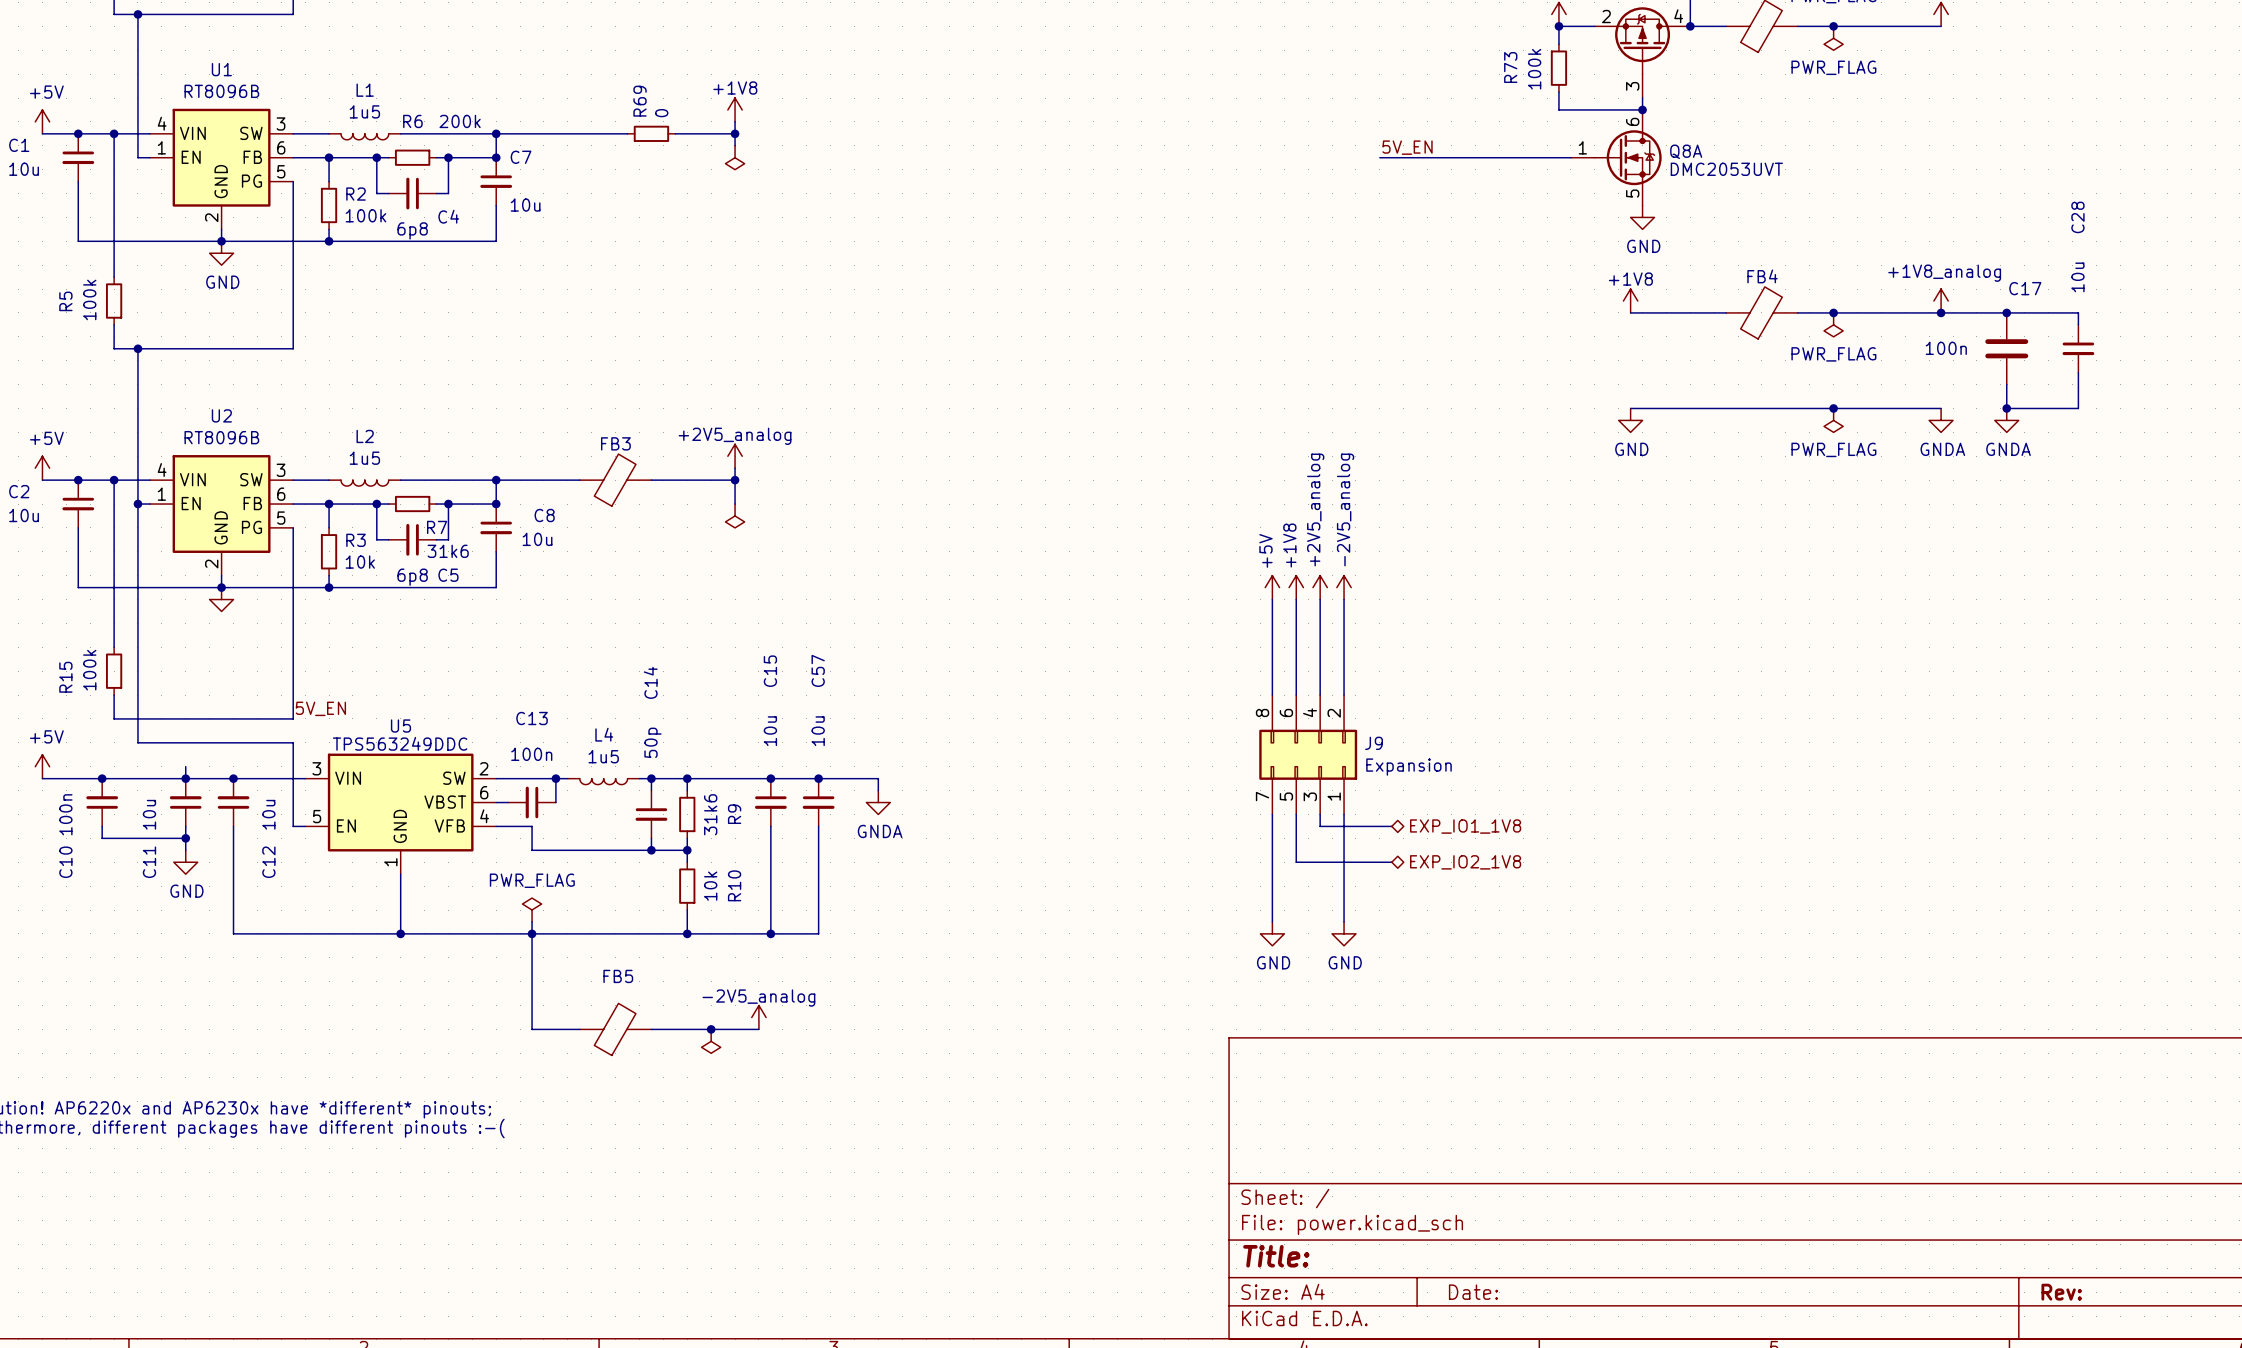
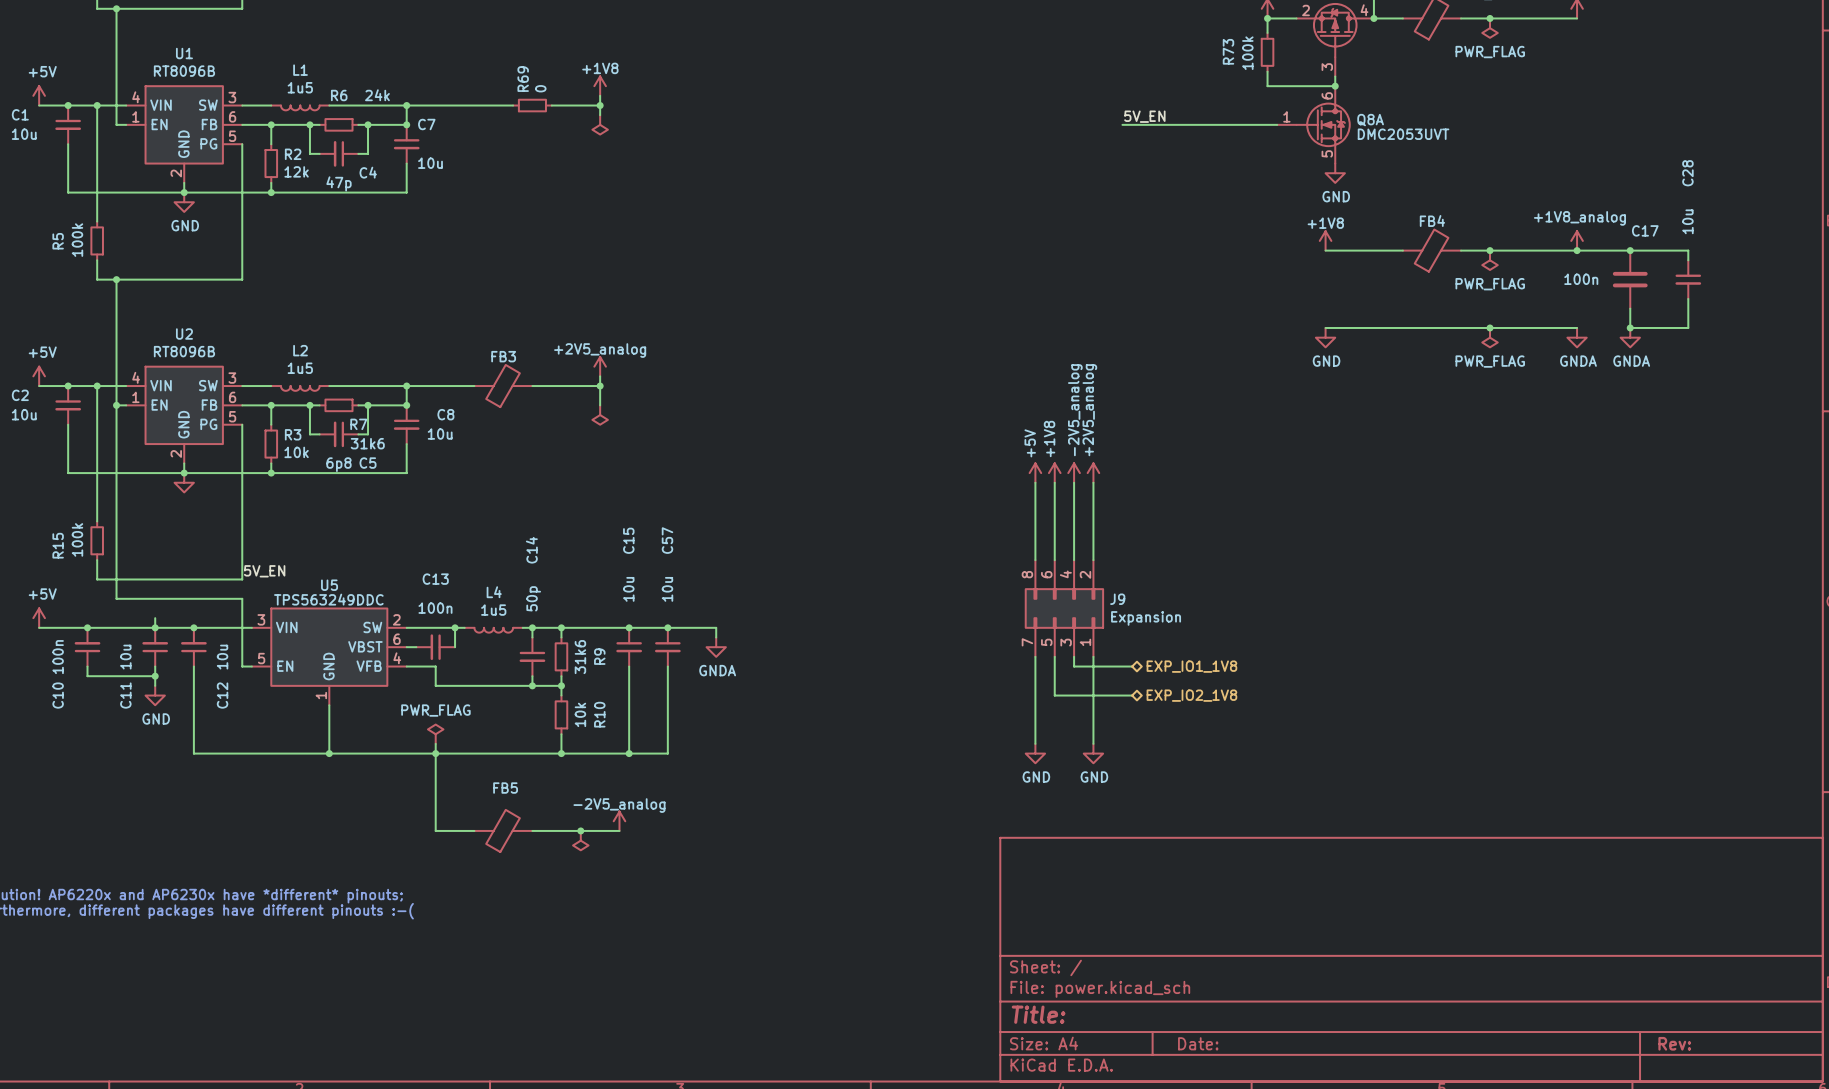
R6 value: 200k (460, 121) -> 24k (377, 95)
R2 value: 100k (365, 215) -> 12k (296, 171)
C4 value: 6p8 (412, 230) -> 47p (338, 183)
power symbol: +2V5_analog (1320, 587) -> -2V5_analog (1074, 473)
power symbol: -2V5_analog (1344, 587) -> +2V5_analog (1093, 473)

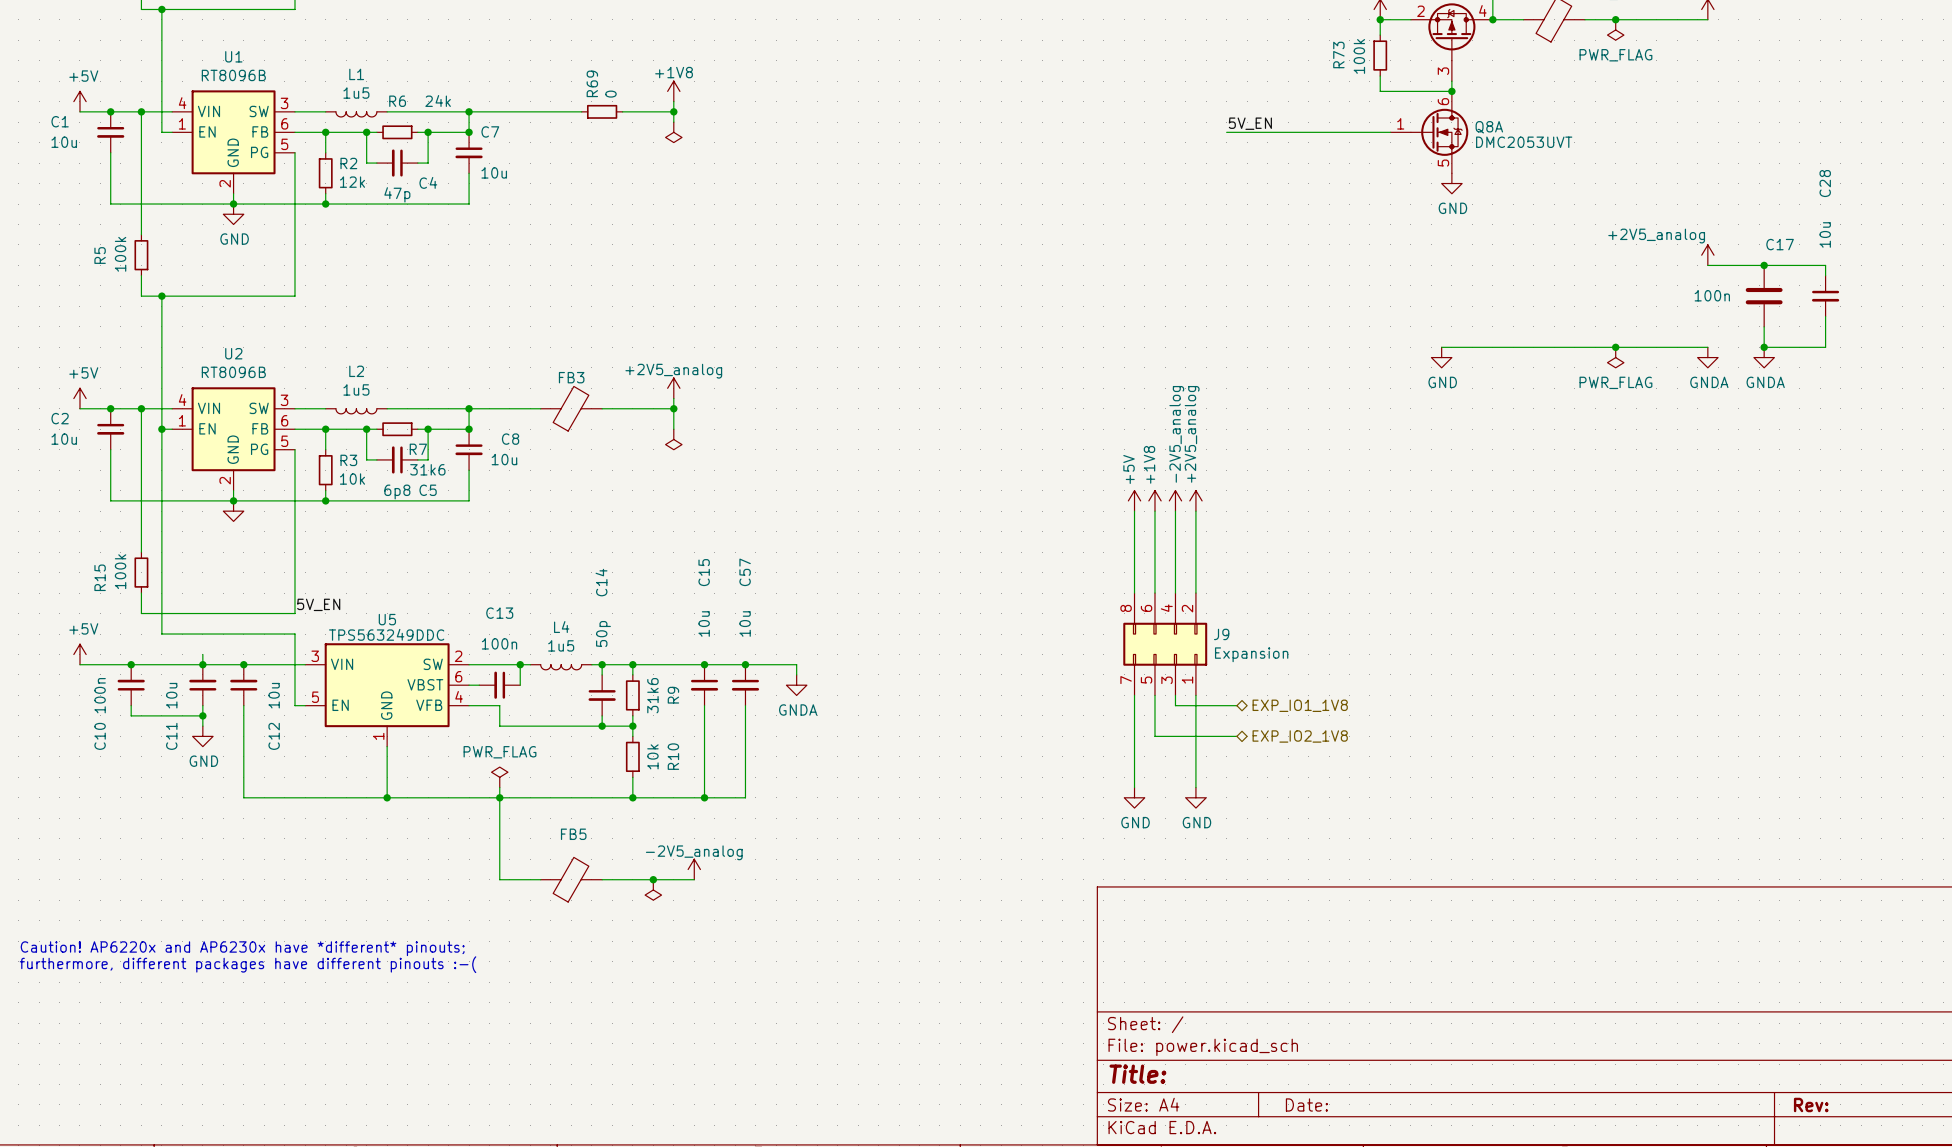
power symbol: +1V8 (1325, 240) -> none
power symbol: +1V8_analog (1577, 240) -> +2V5_analog (1707, 255)
wire: (1325, 250) (1402, 250) -> none
FB4: (1431, 250) -> none
wire: (1460, 250) (1577, 250) -> none
junction: (1490, 250) -> none
junction: (1577, 250) -> none
power symbol: PWR_FLAG (1490, 260) -> none

